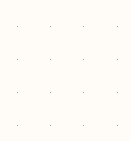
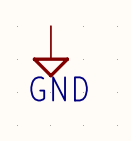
power symbol: none -> GND (50, 51)

